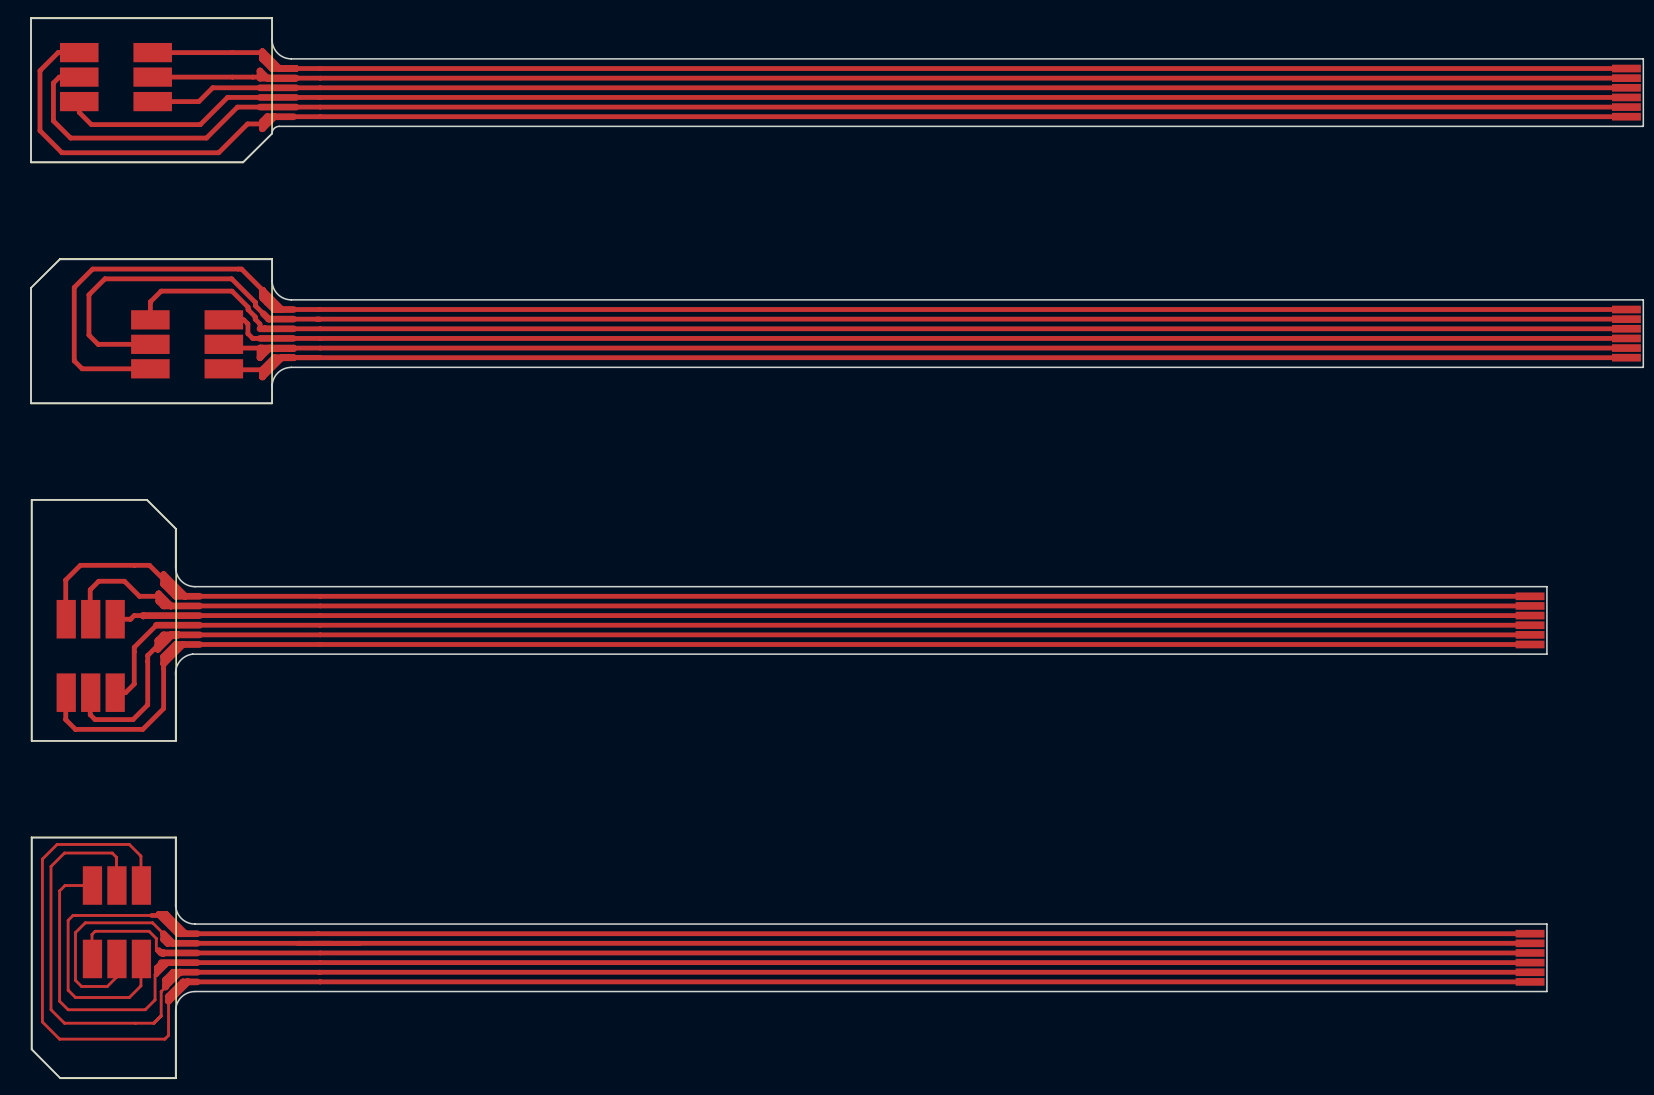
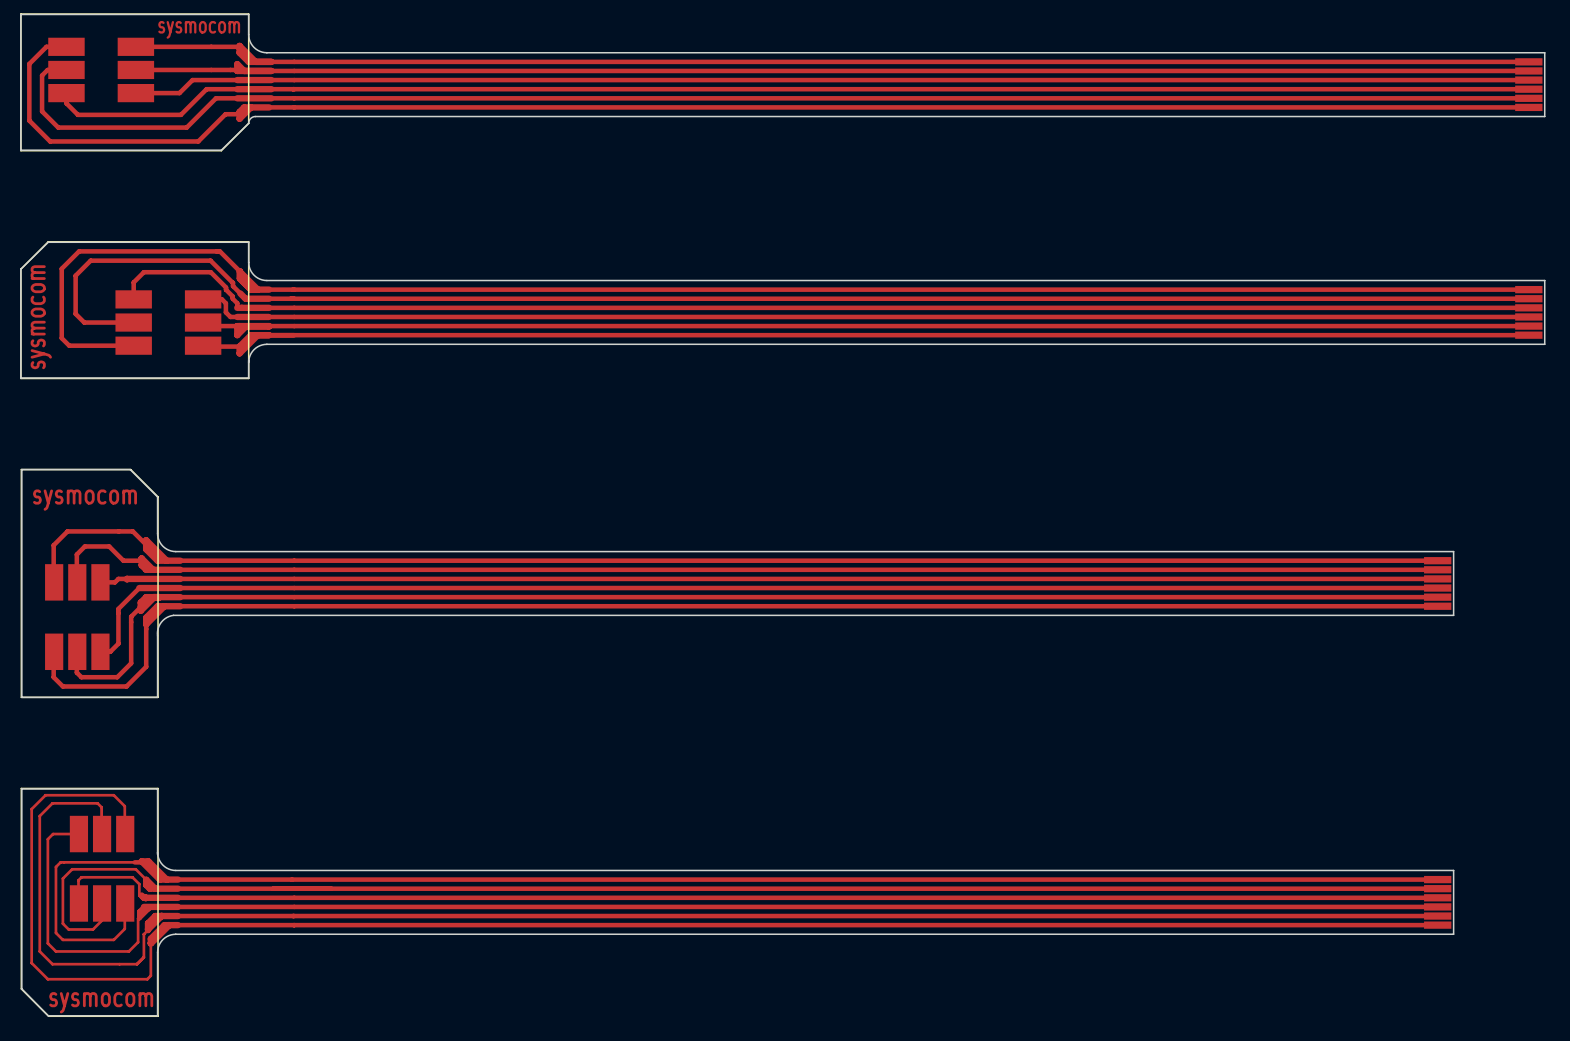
text: none -> sysmocom (199, 29)
text: none -> sysmocom (41, 317)
text: none -> sysmocom (85, 500)
text: none -> sysmocom (101, 1002)

